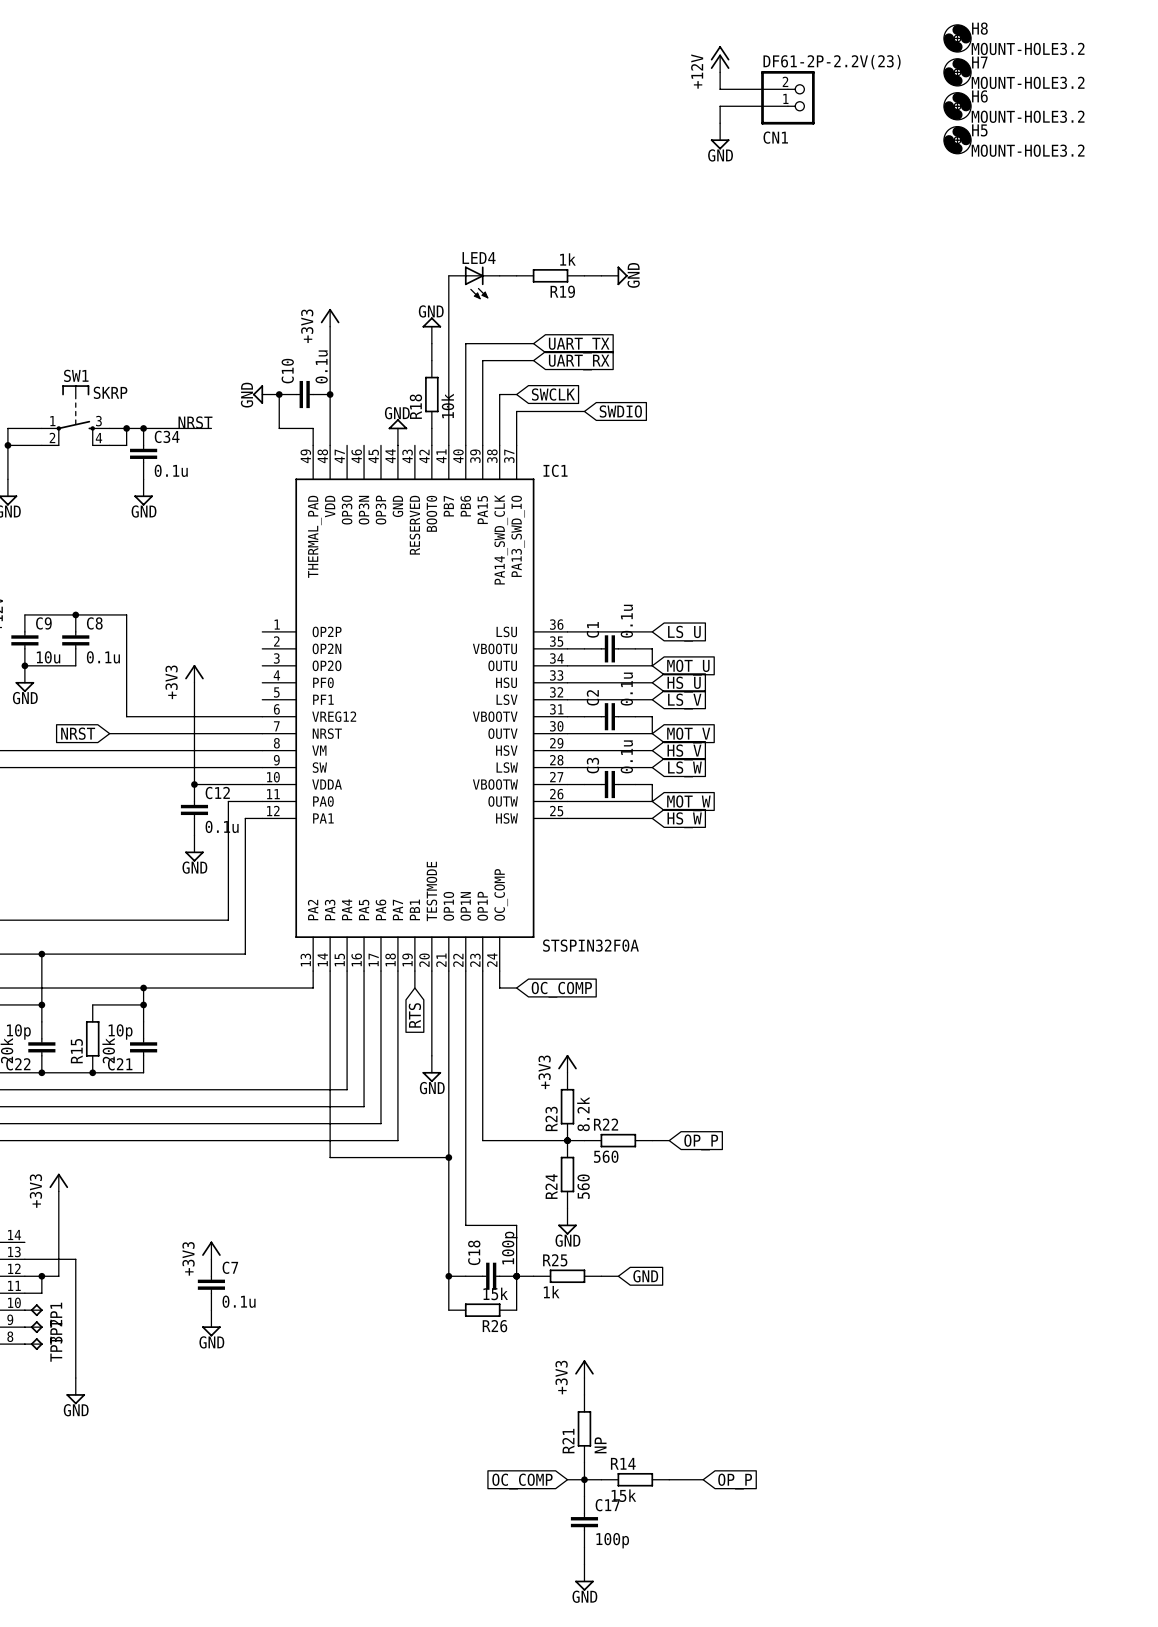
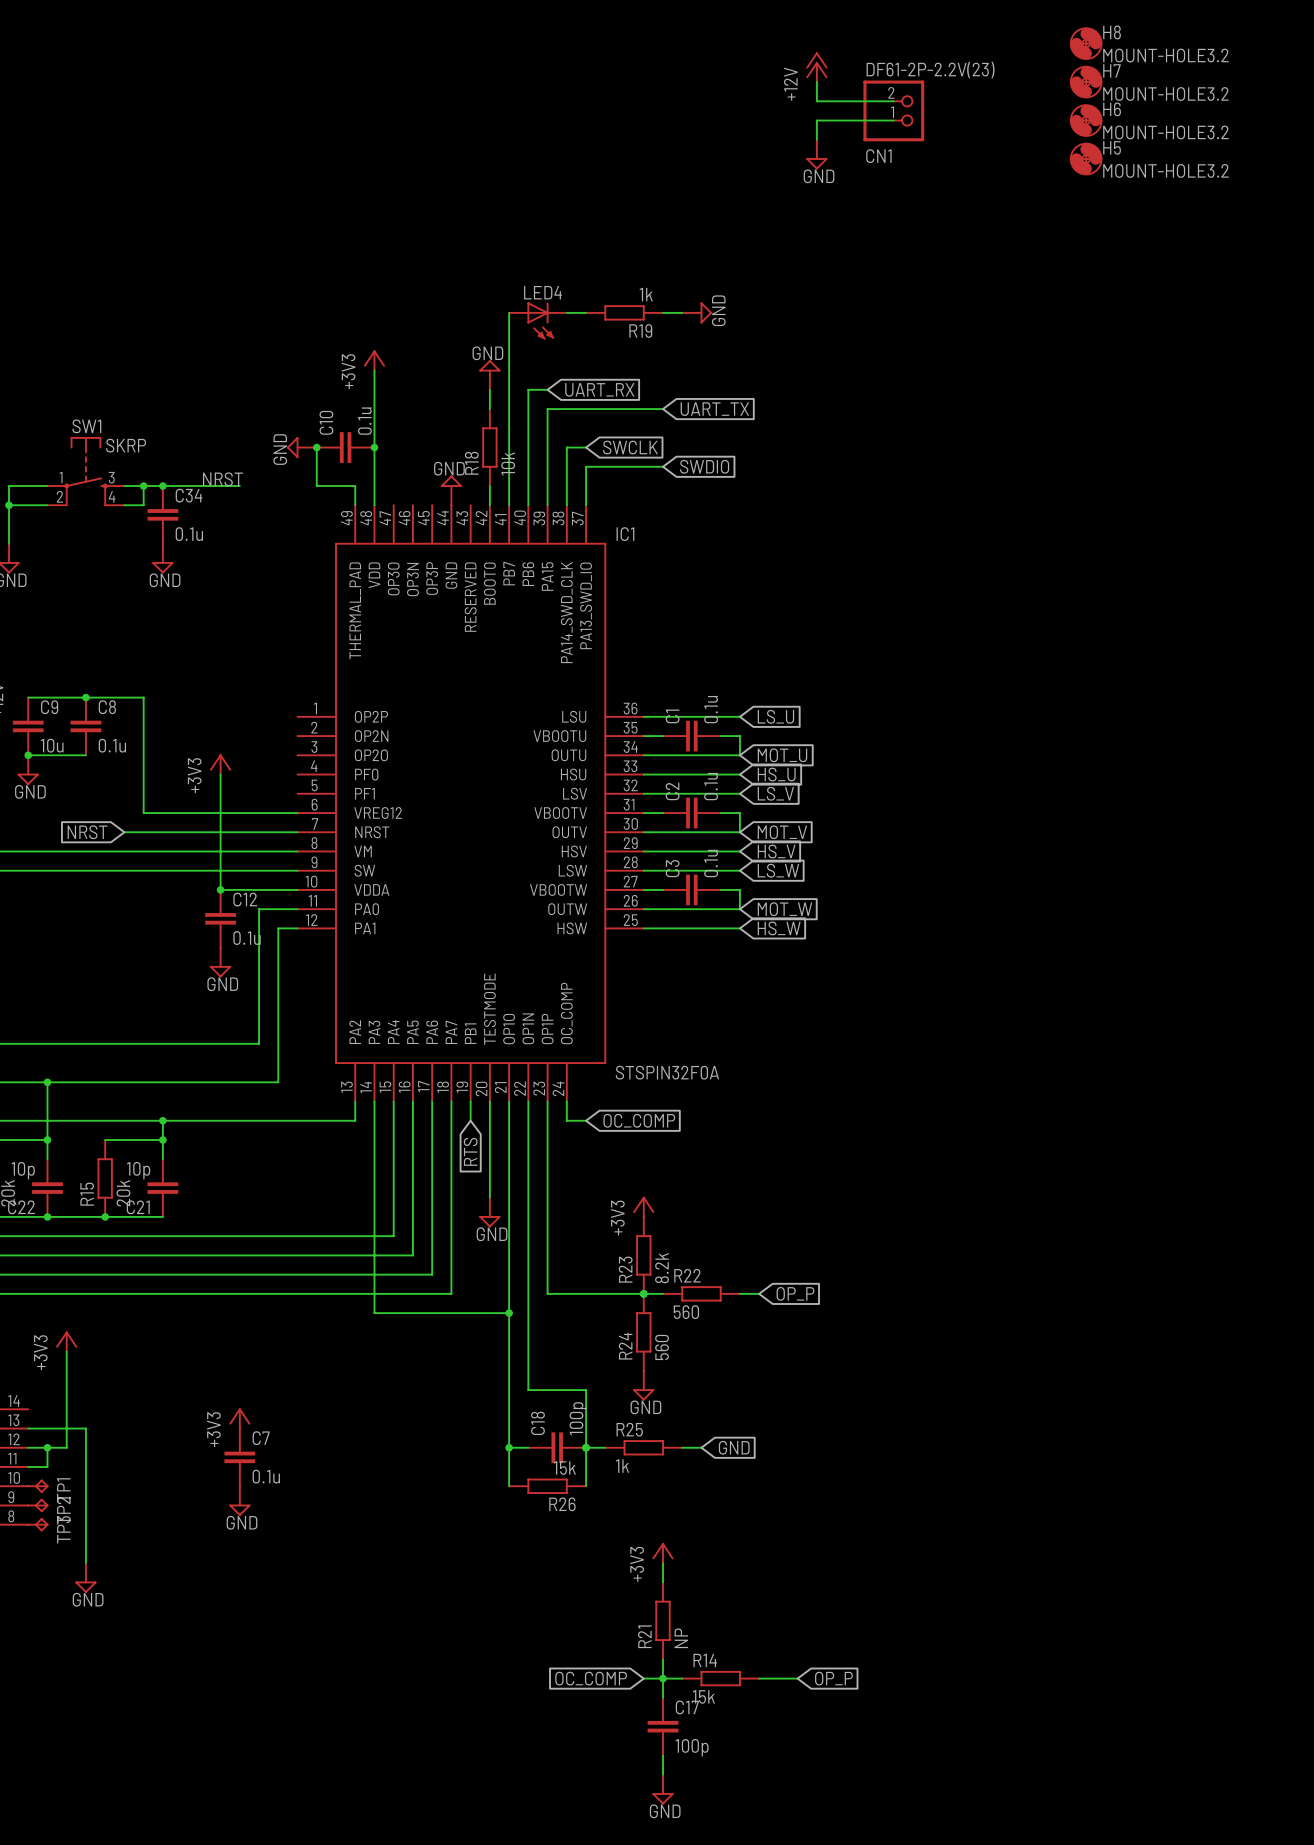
wire: (482, 343) (533, 343) -> (605, 409) (663, 409)
global label position: UART_TX (579, 345) -> UART_TX (714, 409)
global label position: UART_RX (579, 362) -> UART_RX (599, 389)

